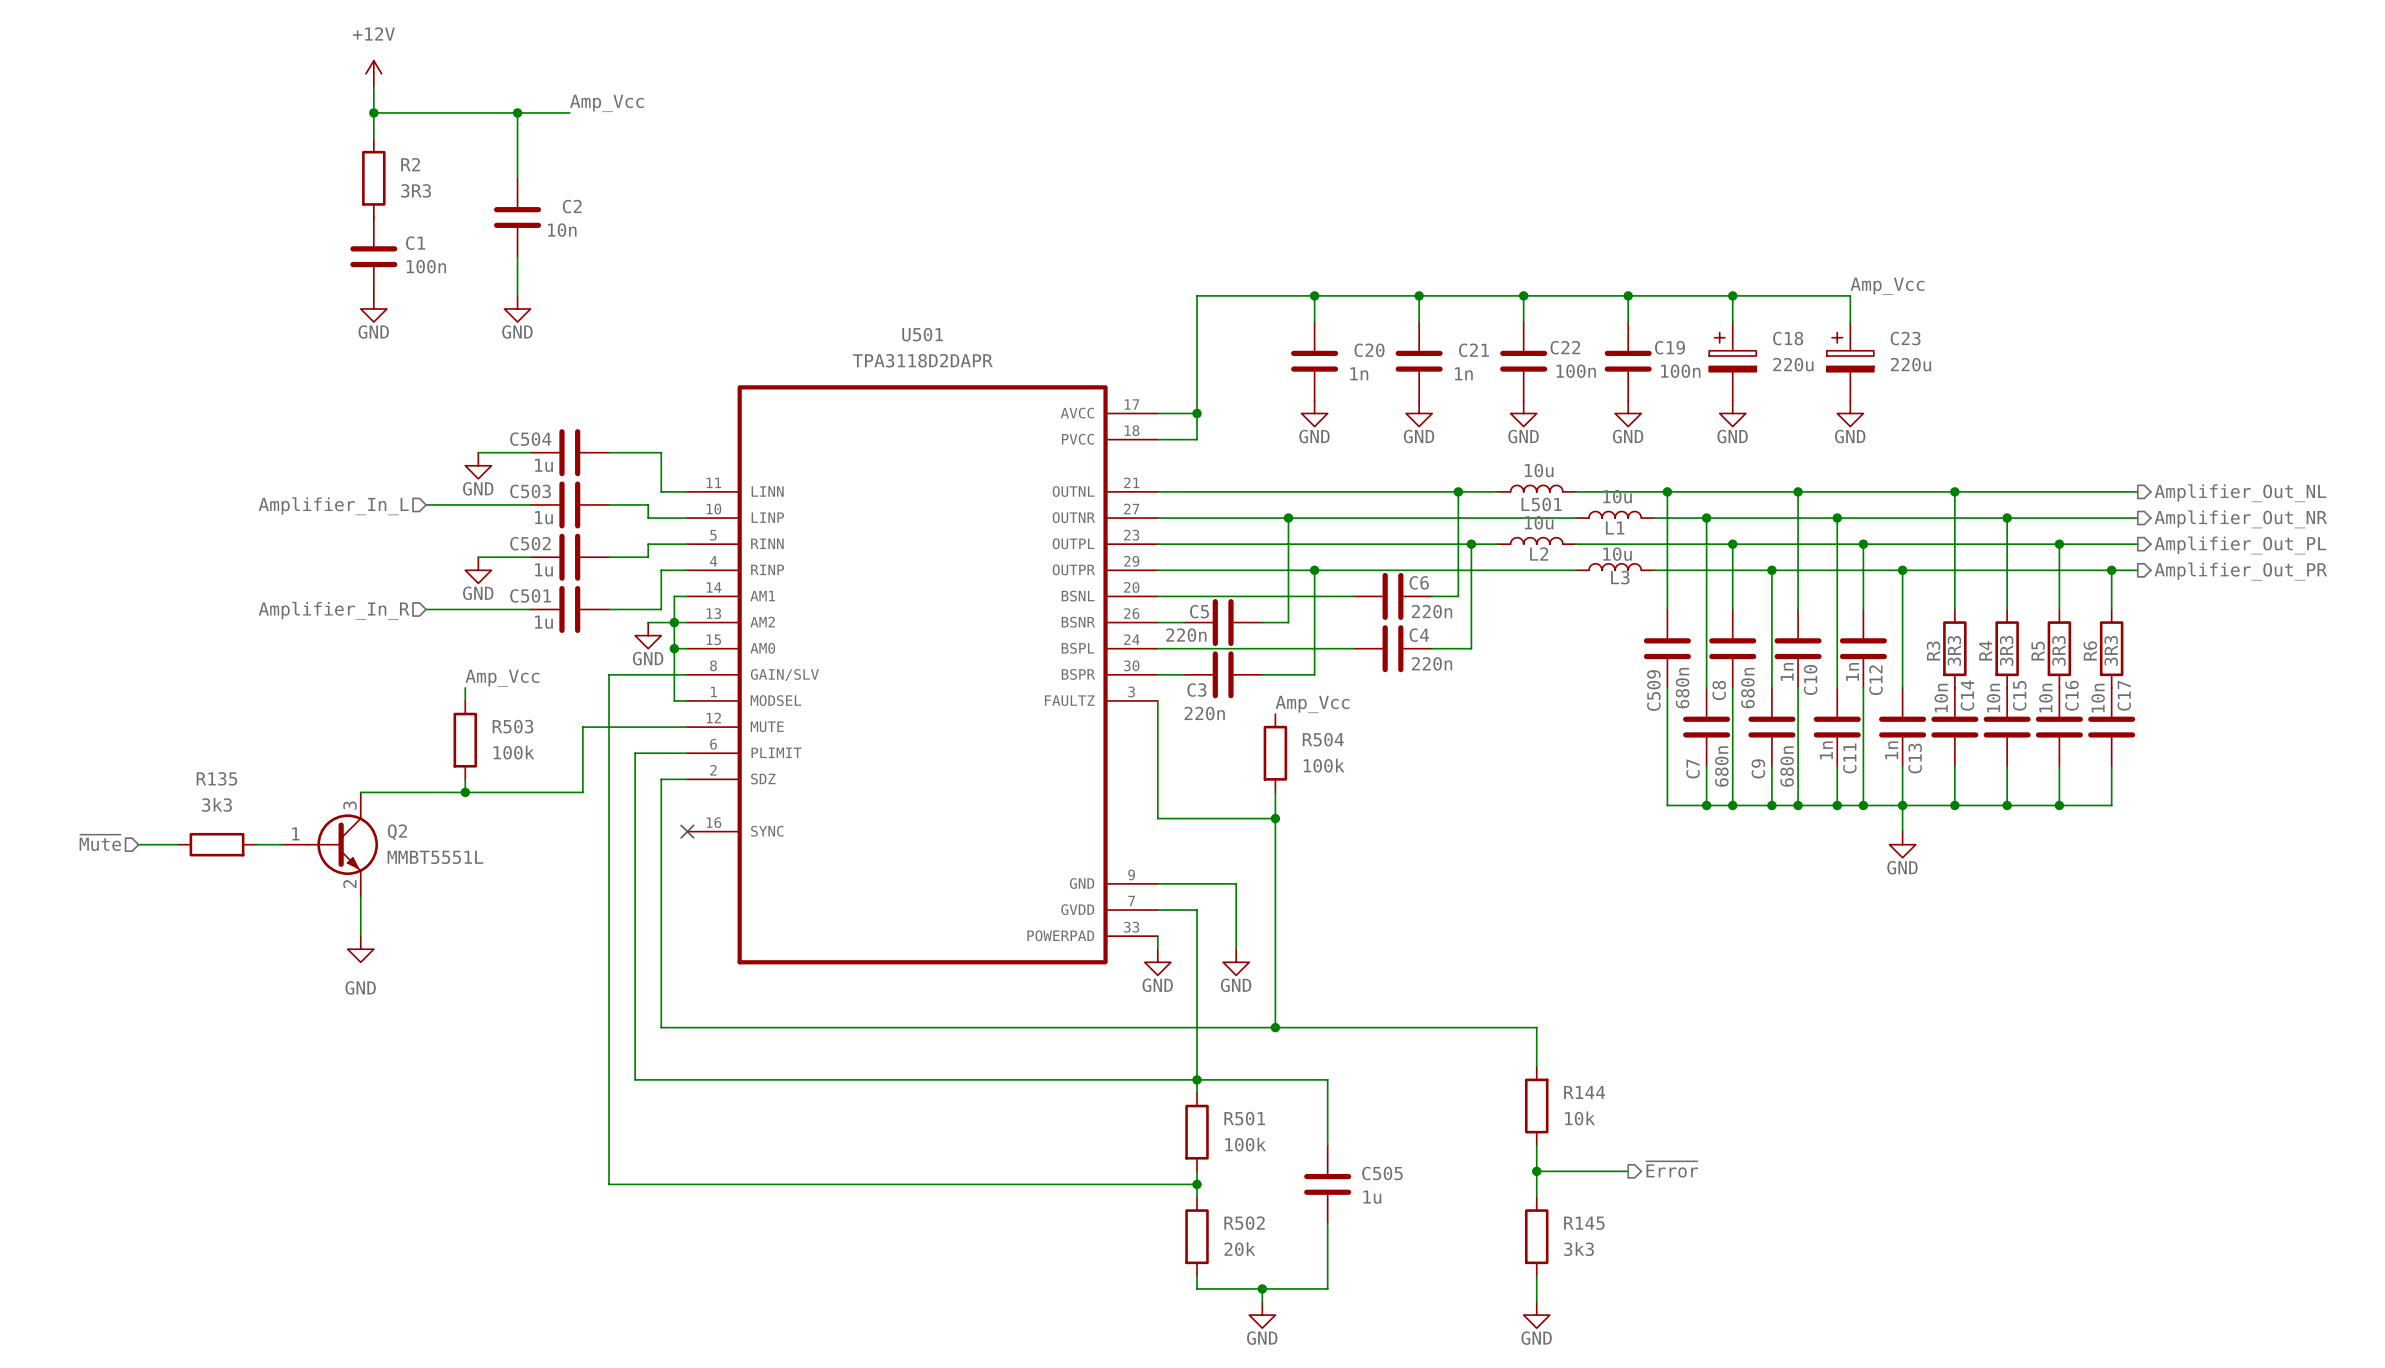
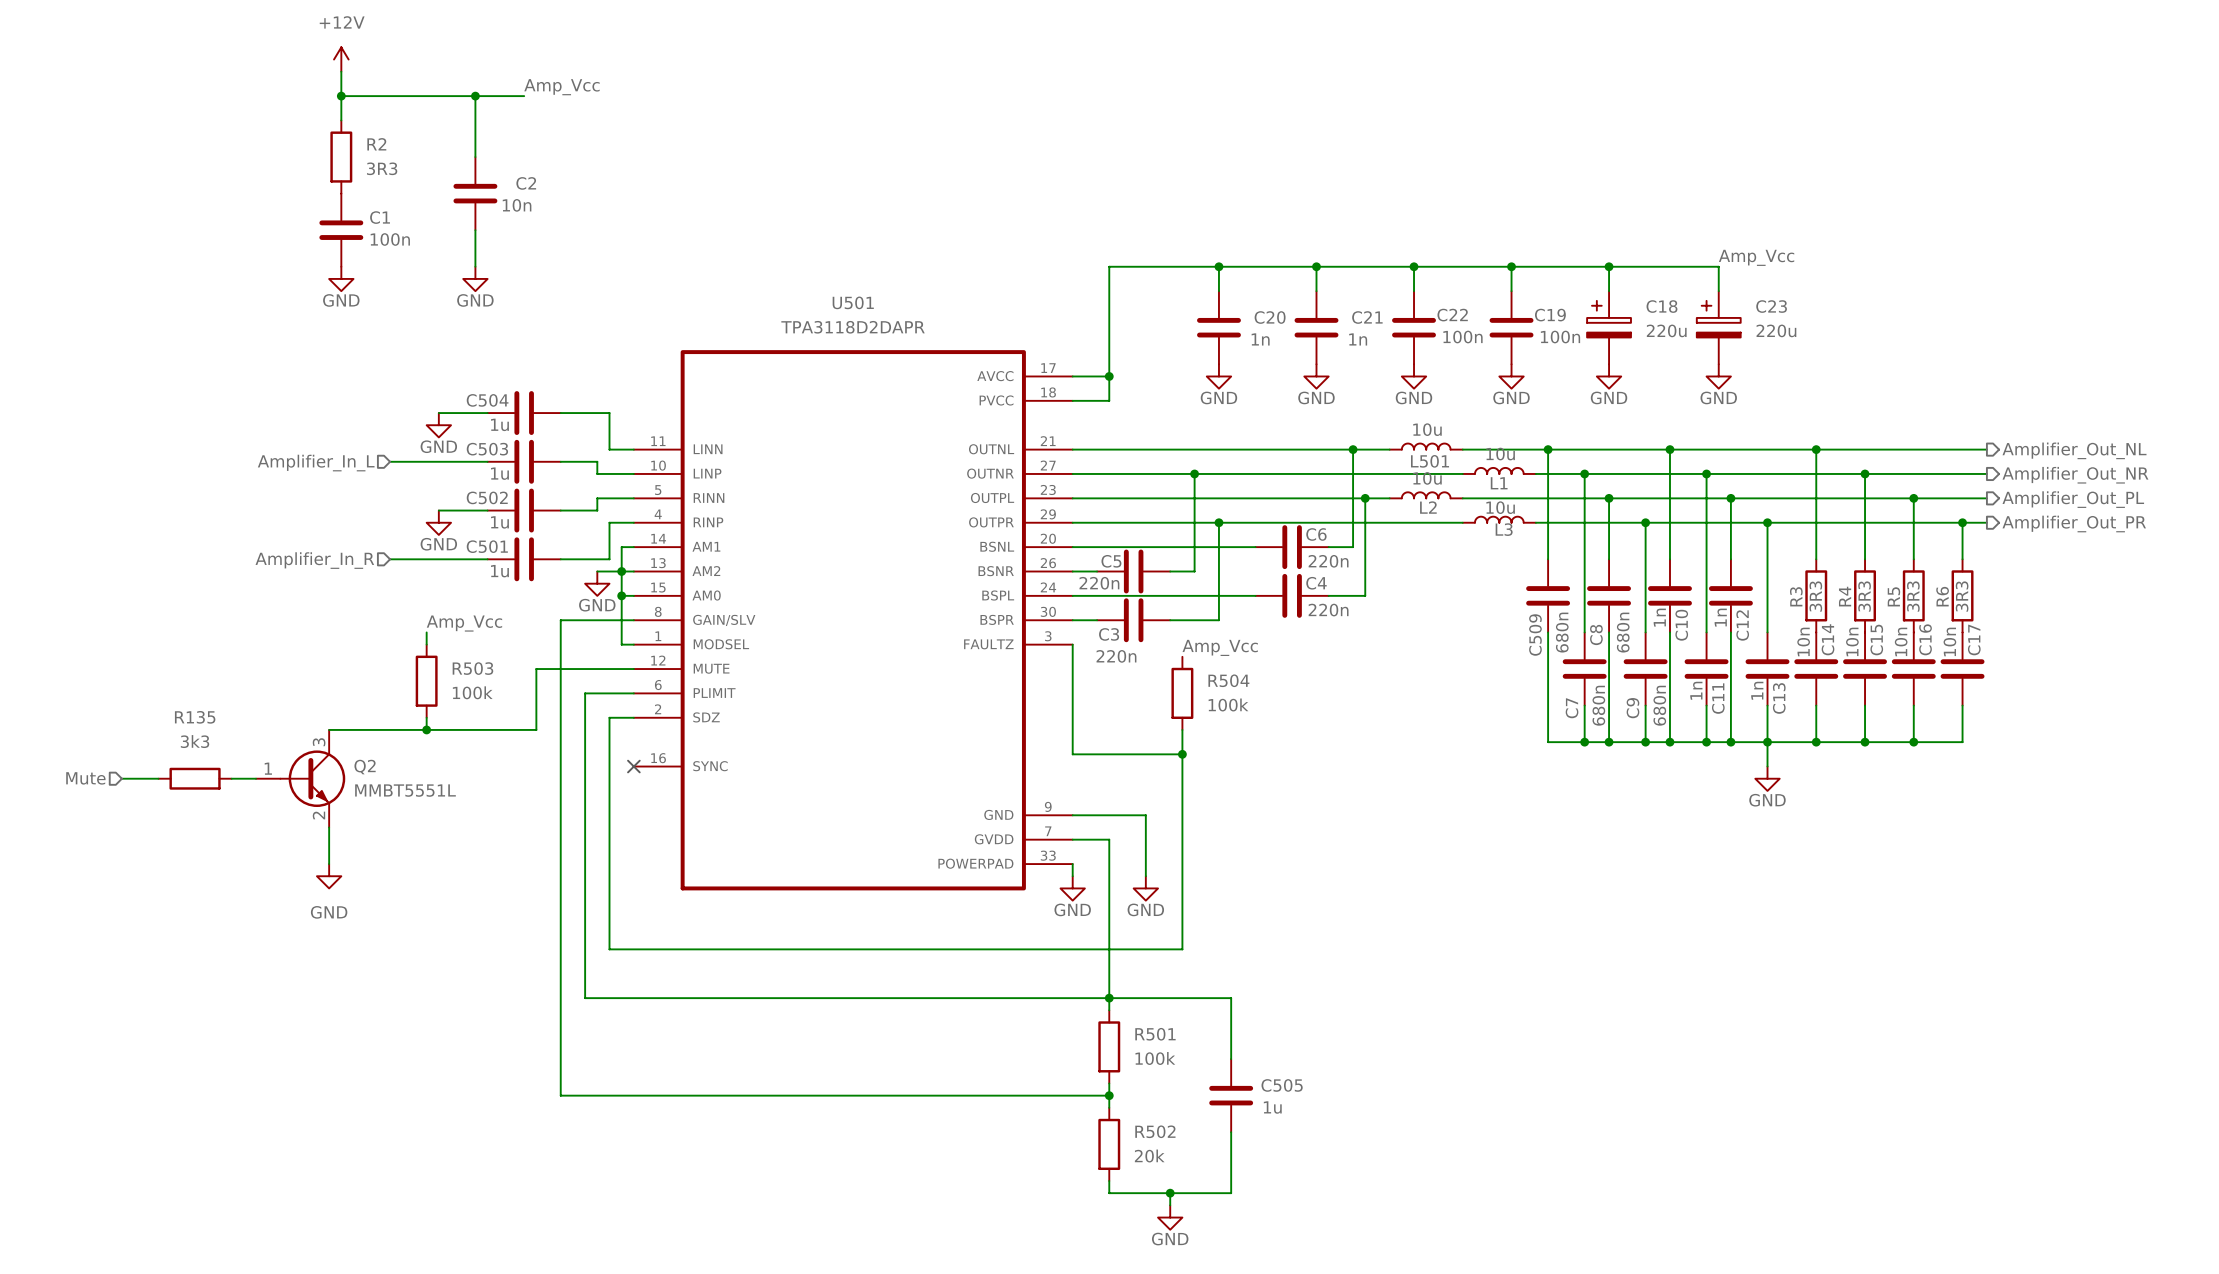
hierarchical label: ~{Mute} (100, 842) -> Mute (85, 778)
wire: (1275, 1027) (1536, 1027) (1536, 1066) -> none
junction: (1275, 1027) -> none
R144: 10k (1536, 1106) -> none
wire: (1536, 1145) (1536, 1197) -> none
hierarchical label: ~{Error} (1672, 1169) -> none
wire: (1536, 1171) (1628, 1171) -> none
junction: (1536, 1171) -> none
R145: 3k3 (1536, 1236) -> none
wire: (1536, 1275) (1536, 1302) -> none
power symbol: GND (1536, 1315) -> none

